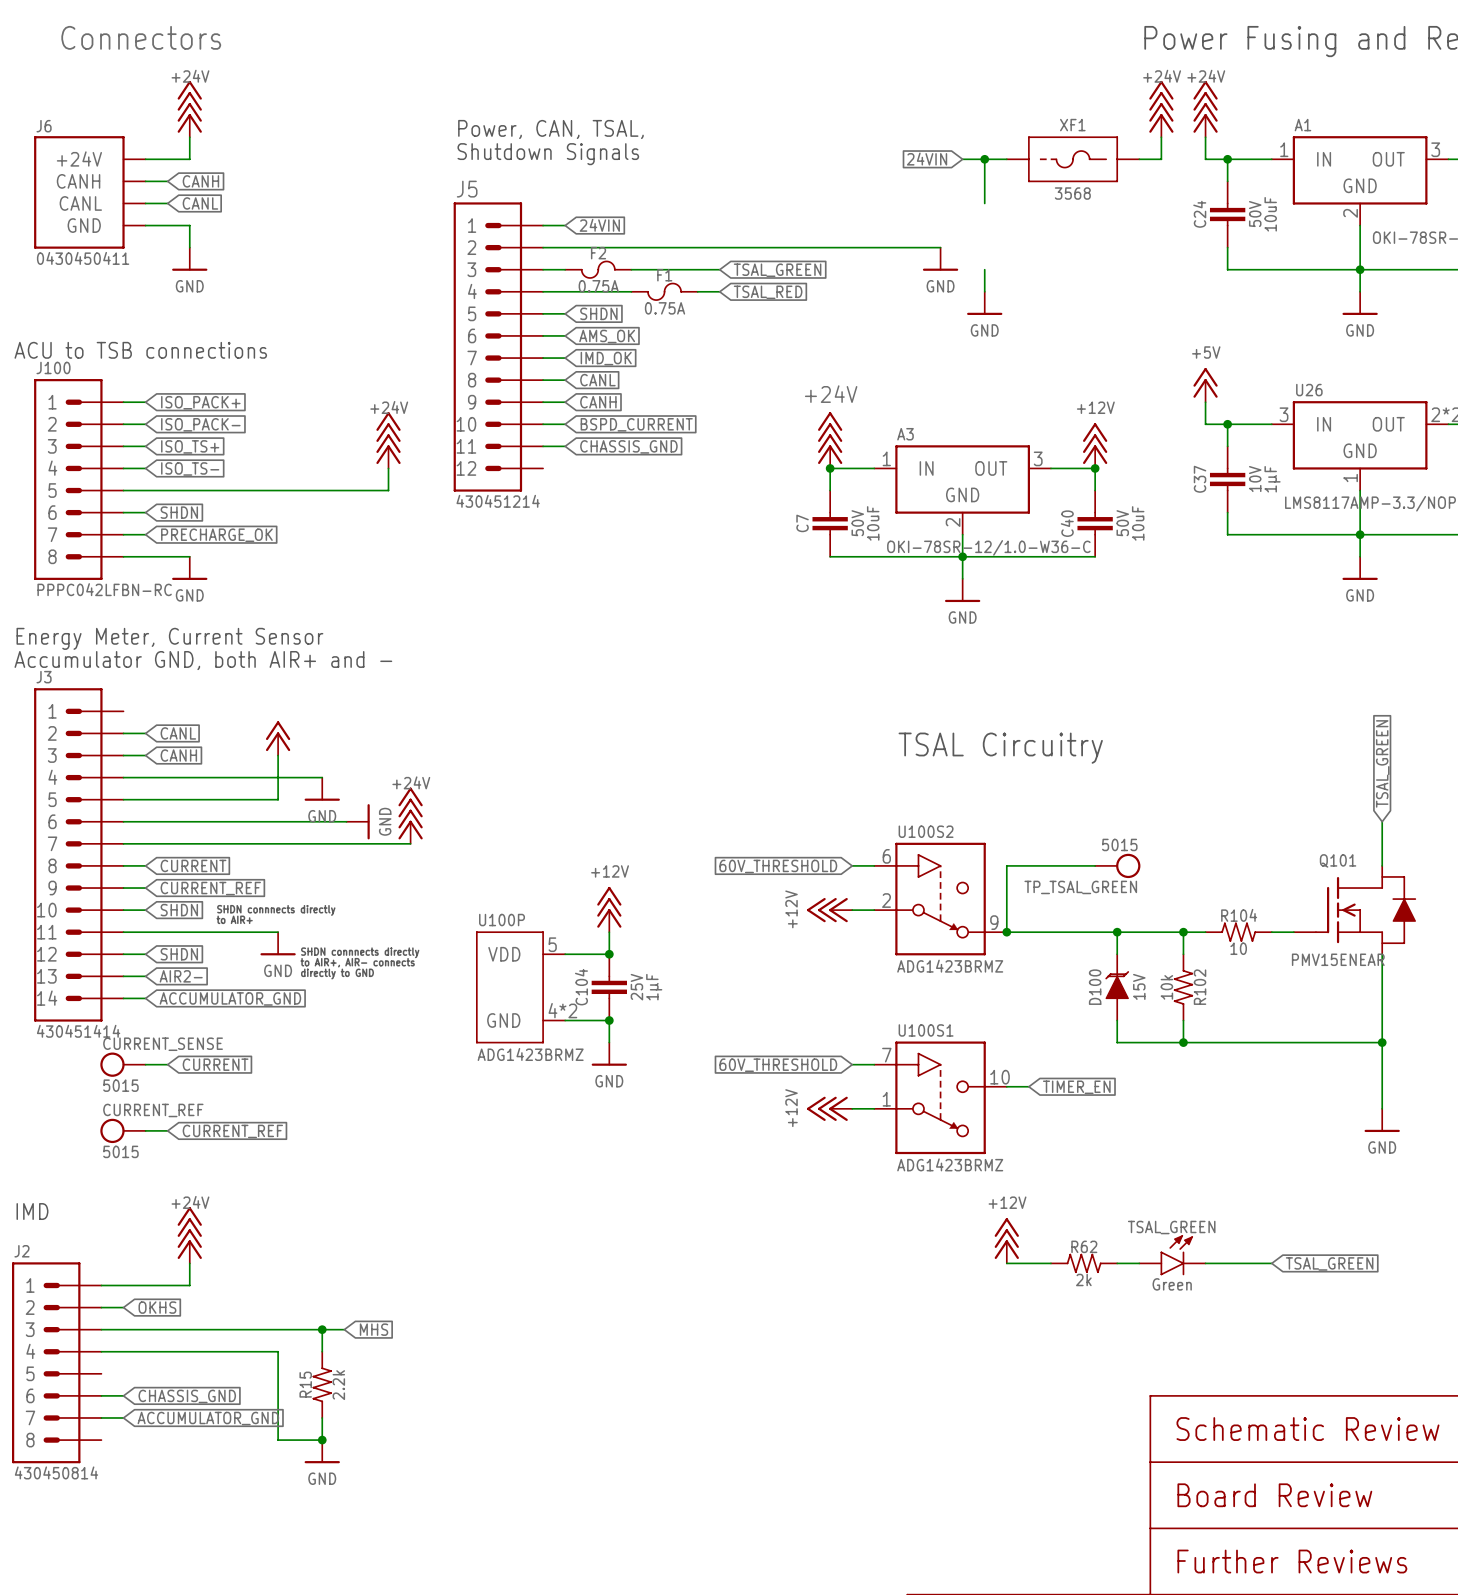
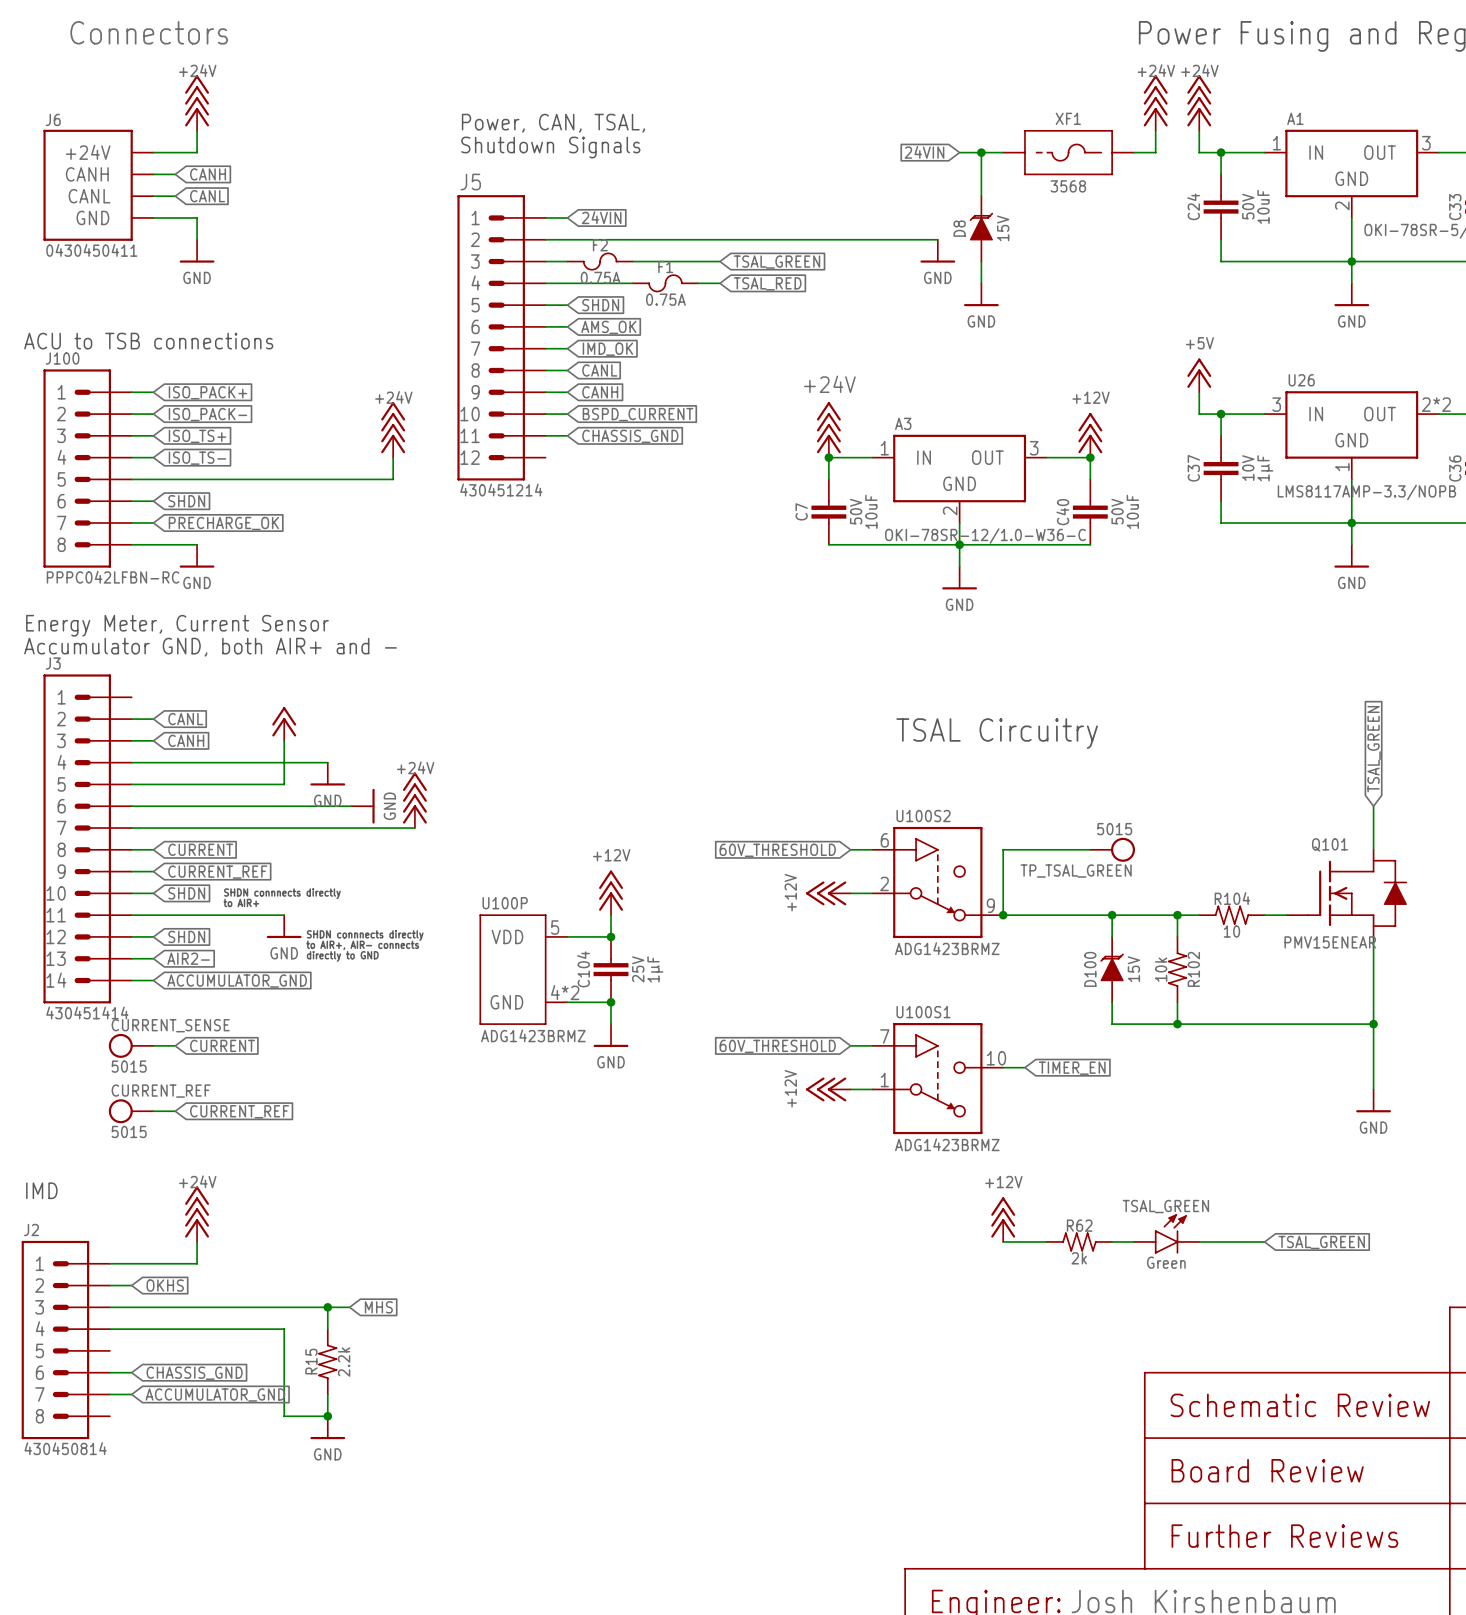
D8: none -> (981, 228)

